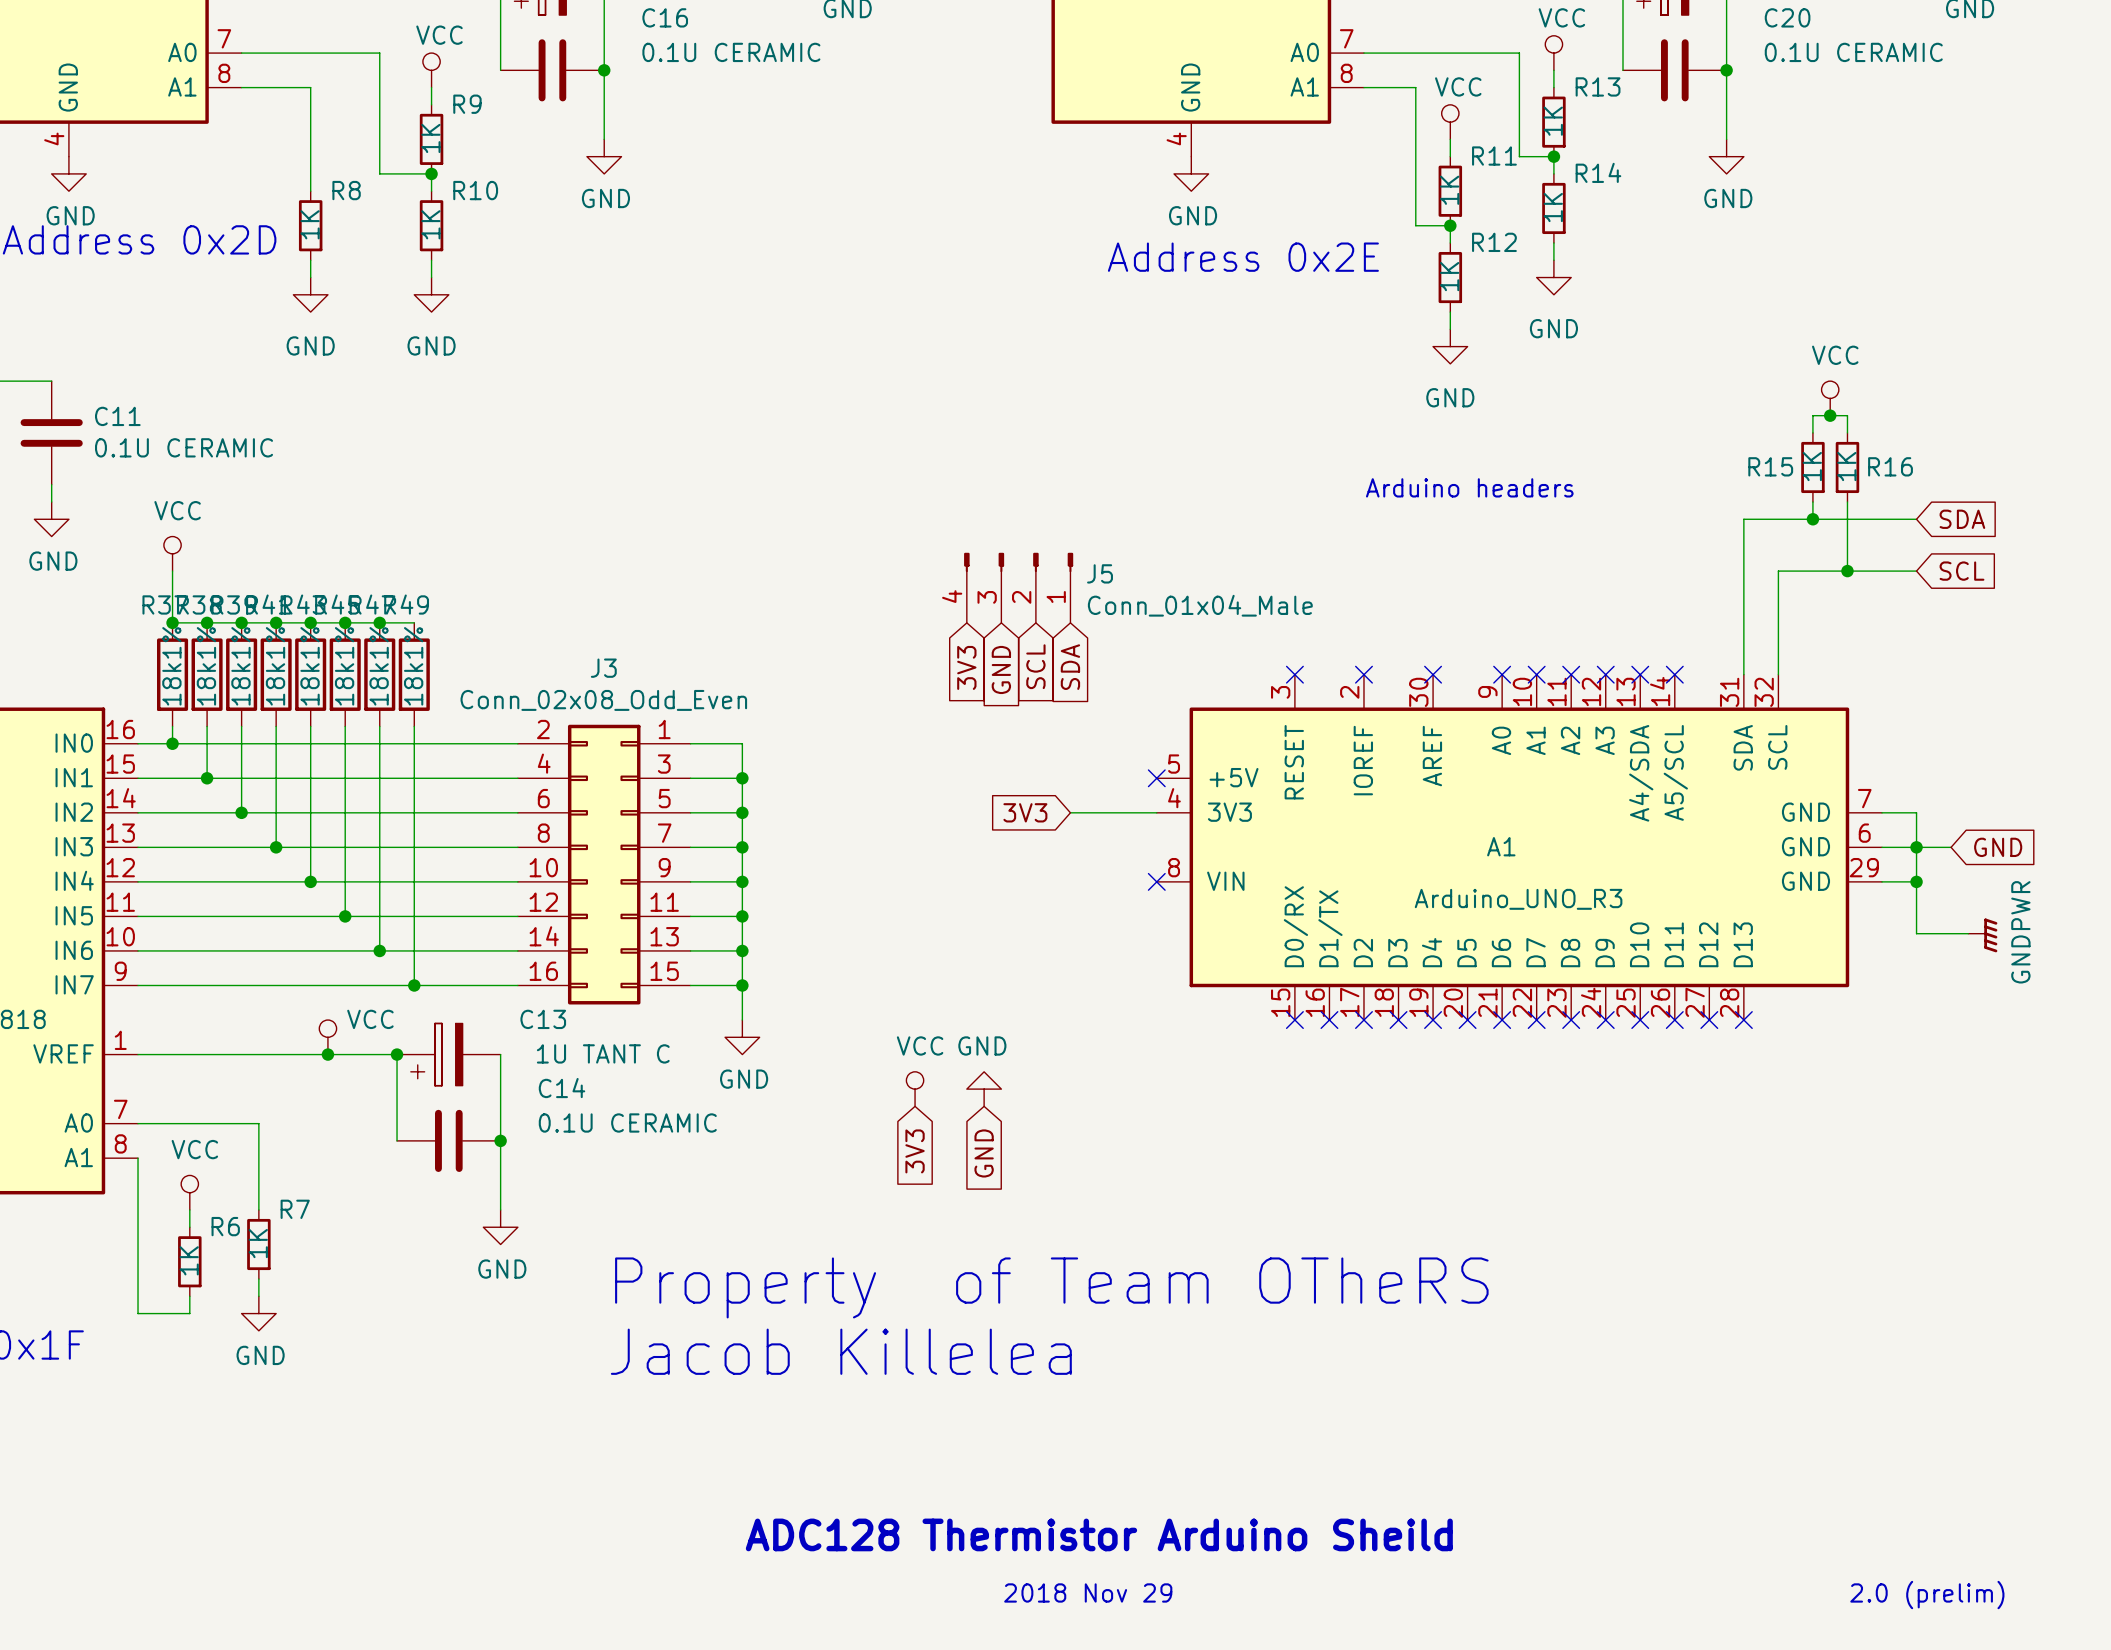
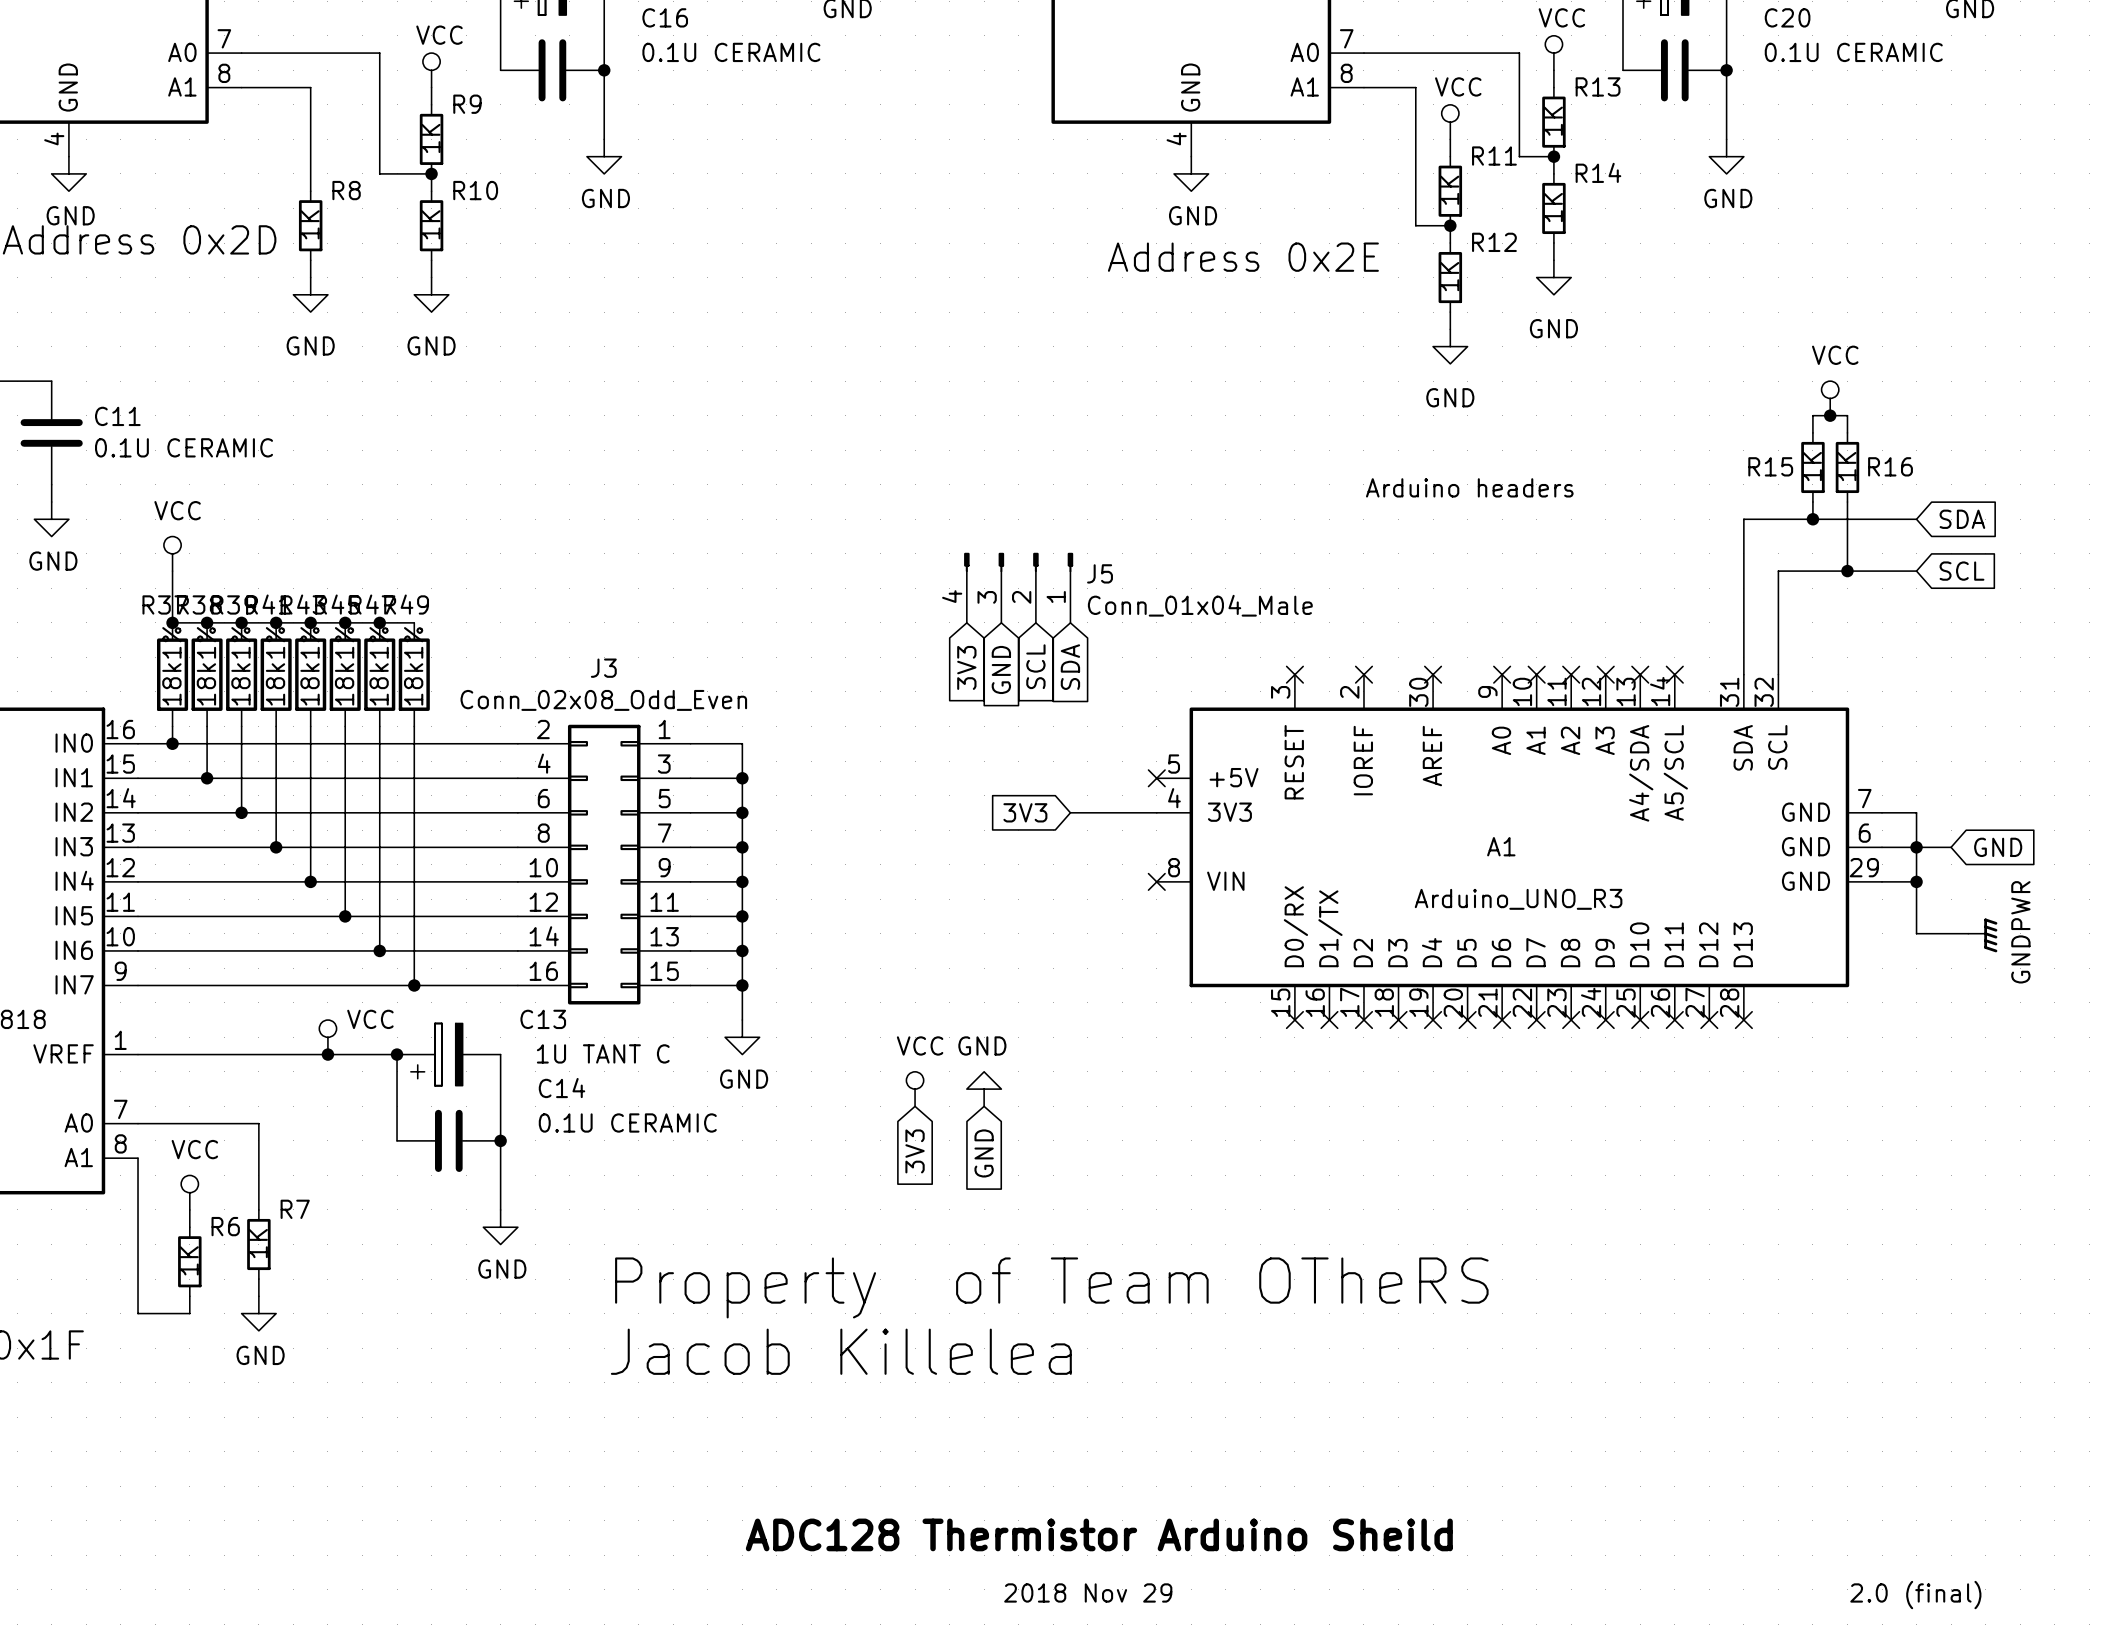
text: 2.0 (prelim) (1927, 1595) -> 2.0 (final) (1915, 1595)

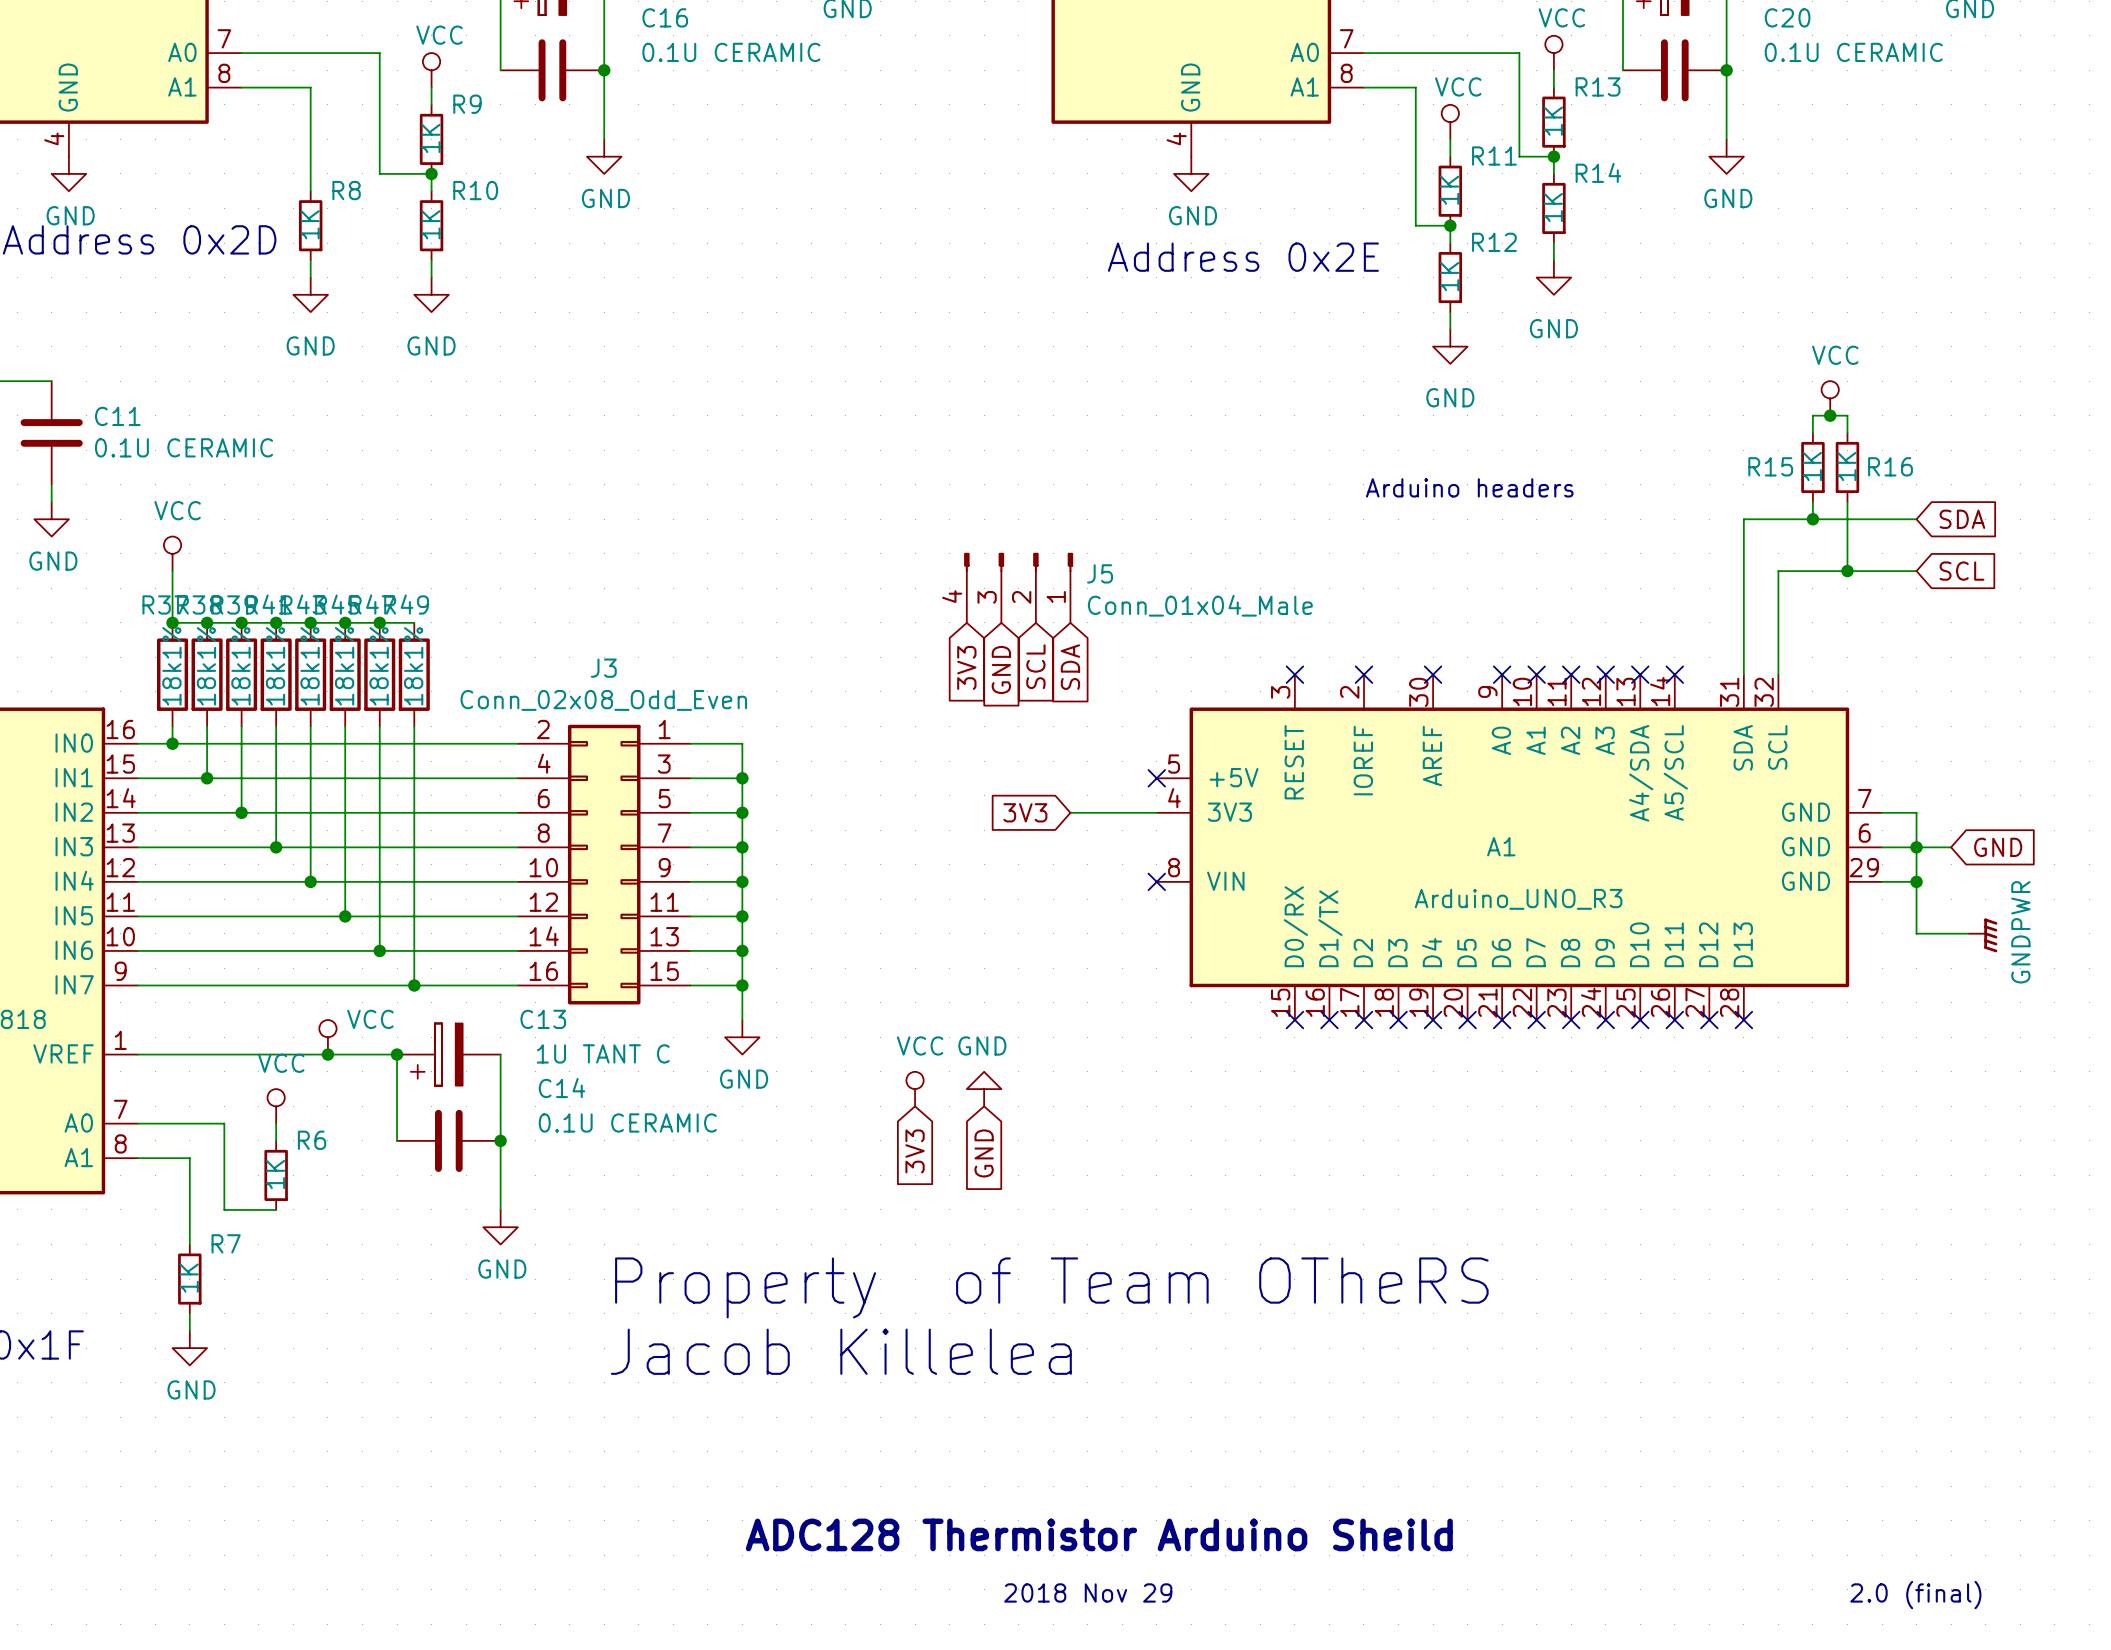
wire: (224, 1123) (258, 1123) (258, 1209) -> (224, 1123) (224, 1209) (276, 1209)
wire: none -> (276, 1123) (276, 1140)
wire: (138, 1158) (138, 1313) (189, 1313) (189, 1296) -> (138, 1158) (189, 1158) (189, 1209)
power symbol position: VCC (189, 1192) -> VCC (276, 1106)
R7 position: (258, 1244) -> (189, 1279)
R6 position: (189, 1261) -> (276, 1175)
wire: (258, 1279) (258, 1296) -> (189, 1313) (189, 1330)
power symbol position: GND (258, 1313) -> GND (189, 1348)

